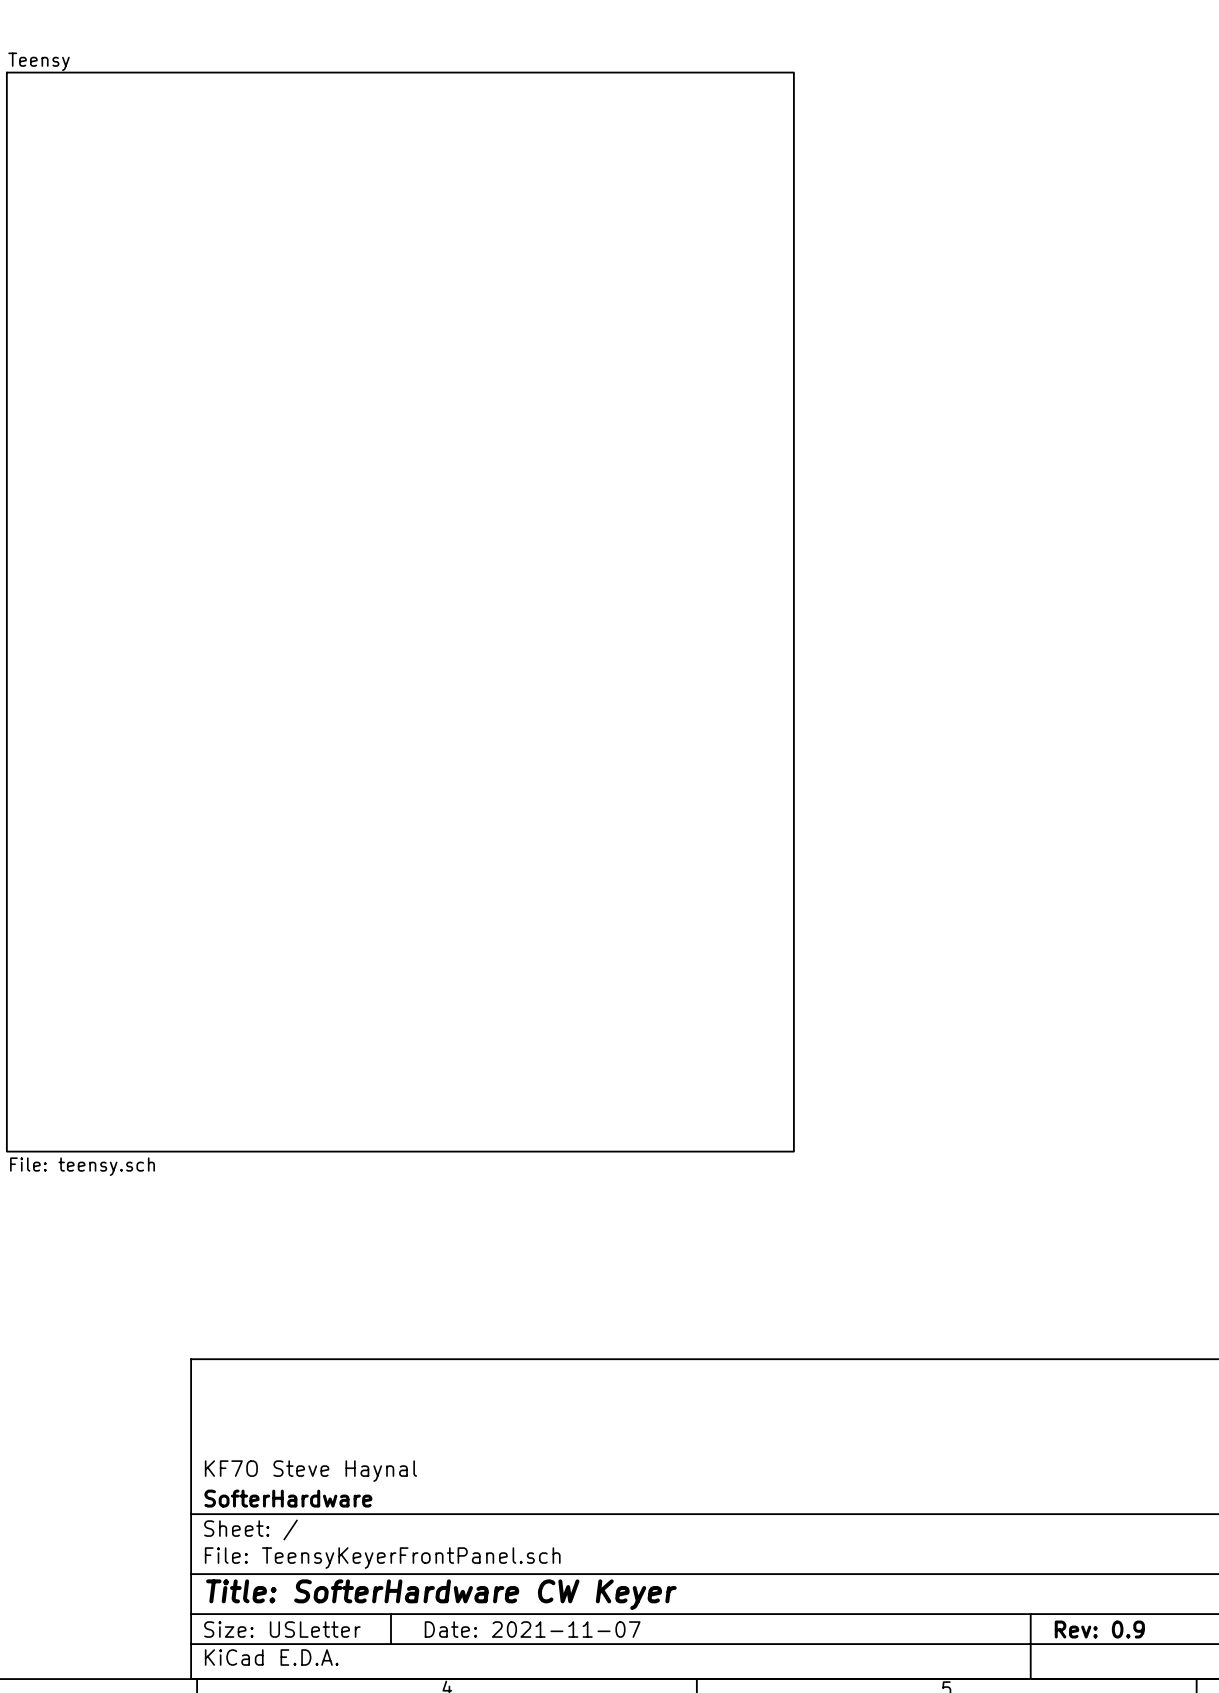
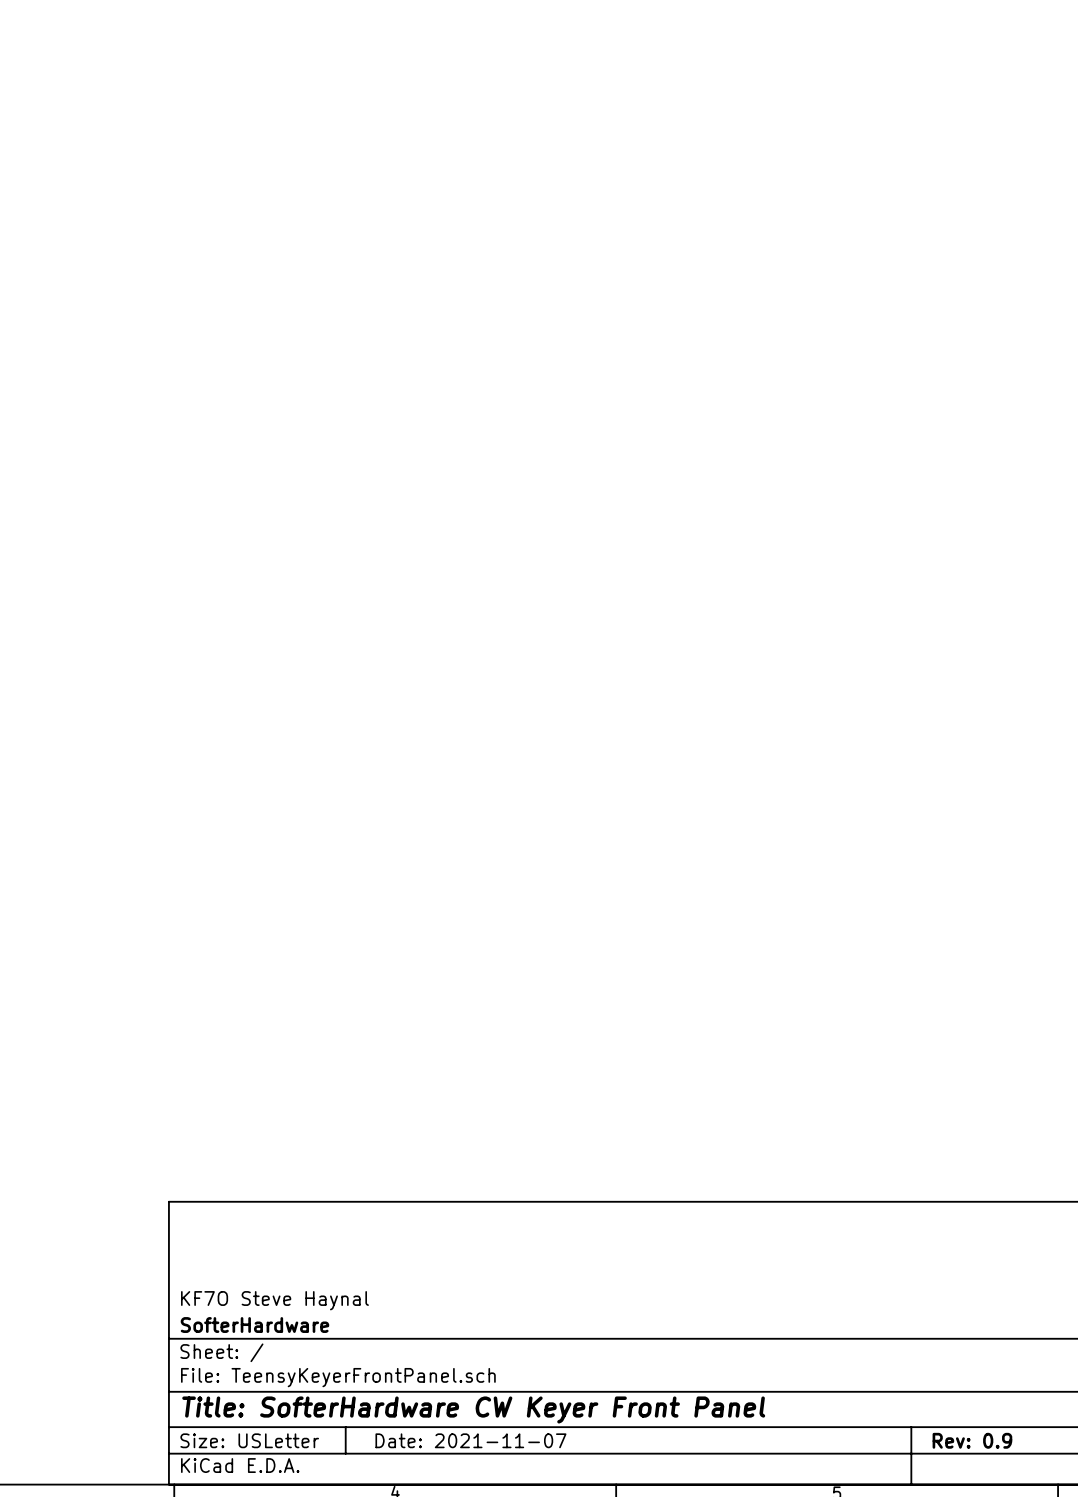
sheet Teensy: File: teensy.sch (400, 612) -> none
title block: Title: SofterHardware CW Keyer (441, 1594) -> Title: SofterHardware CW Keyer Front Panel (473, 1409)

